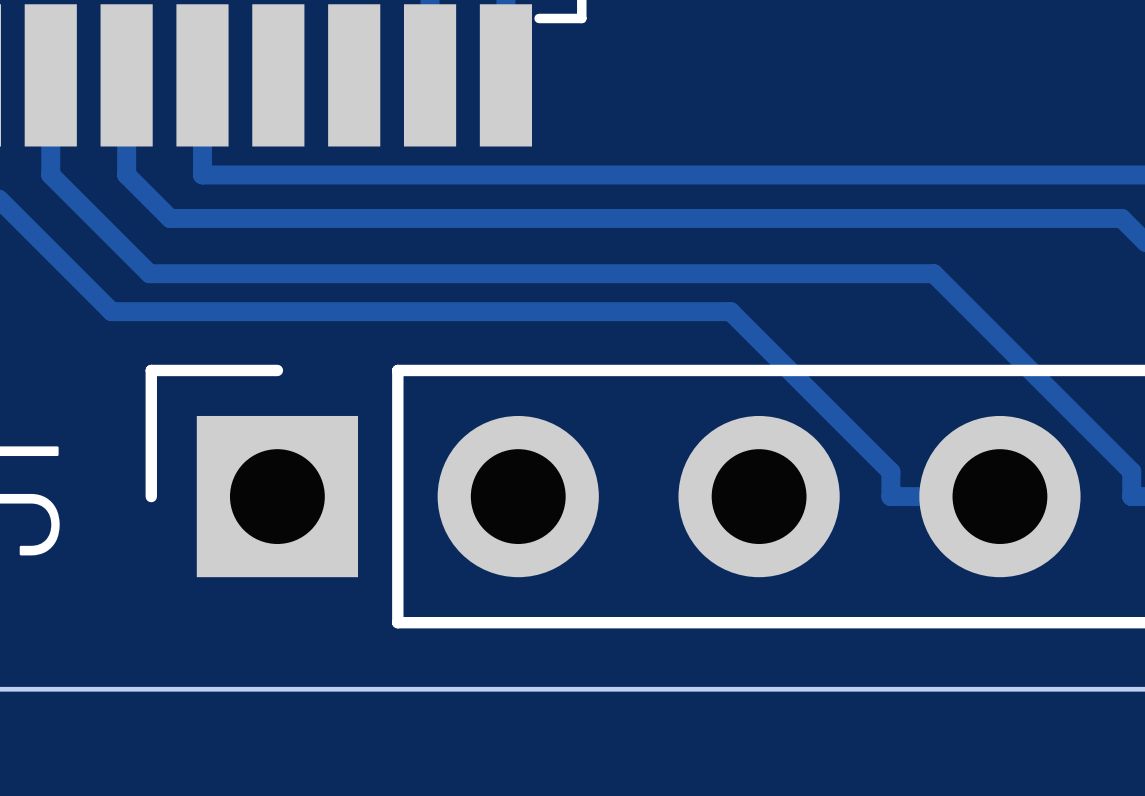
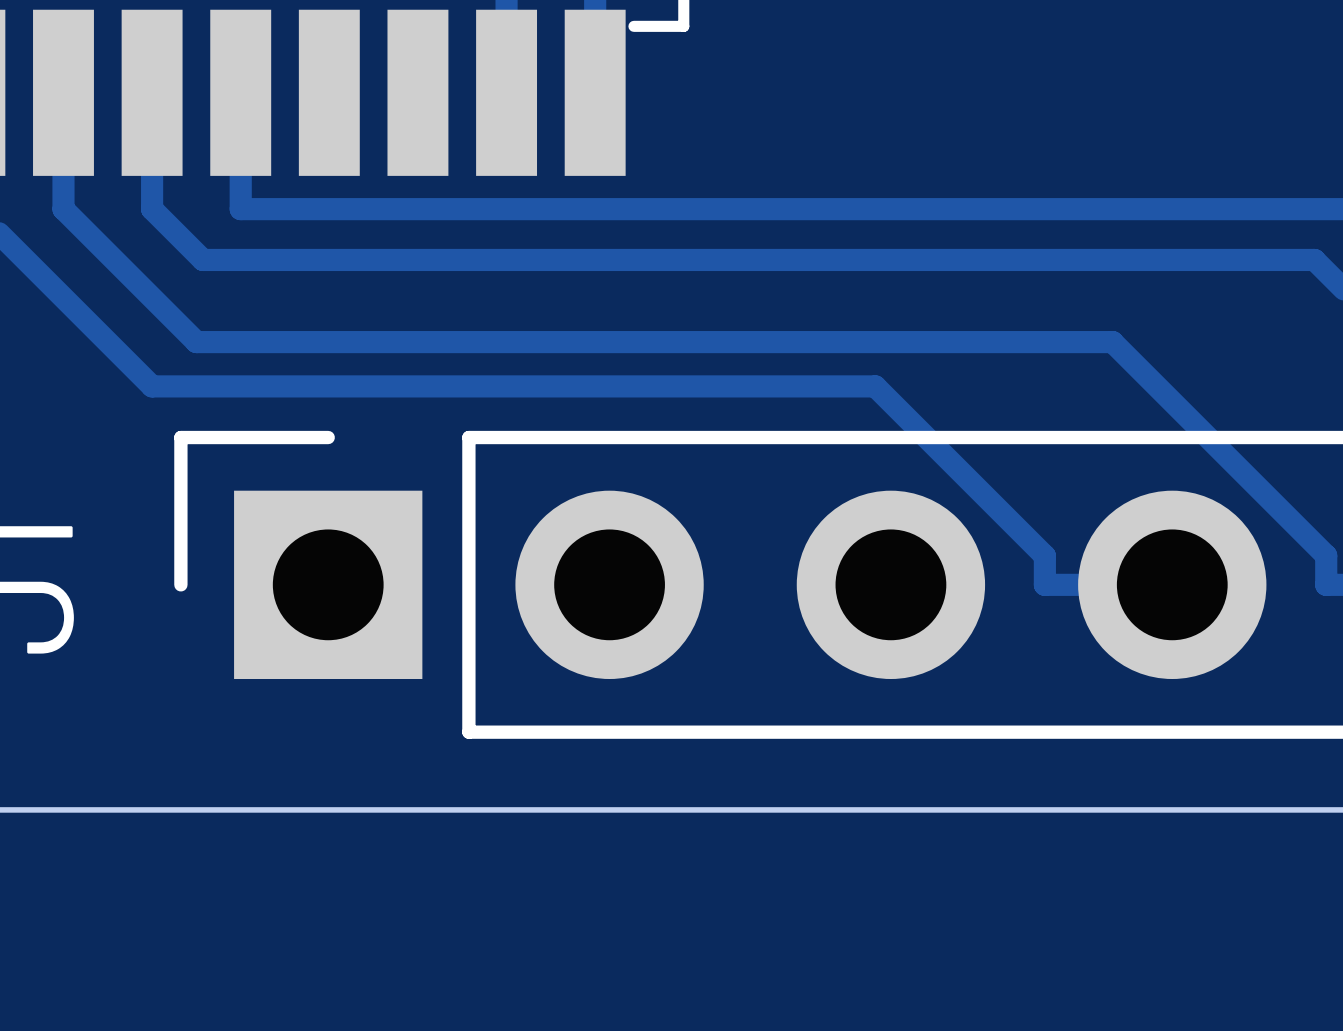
track: (149, 273) (933, 273) (948, 288) -> (178, 324) (196, 342) (1112, 342)
track: (111, 311) (730, 311) (745, 326) -> (134, 368) (152, 386) (875, 386)

